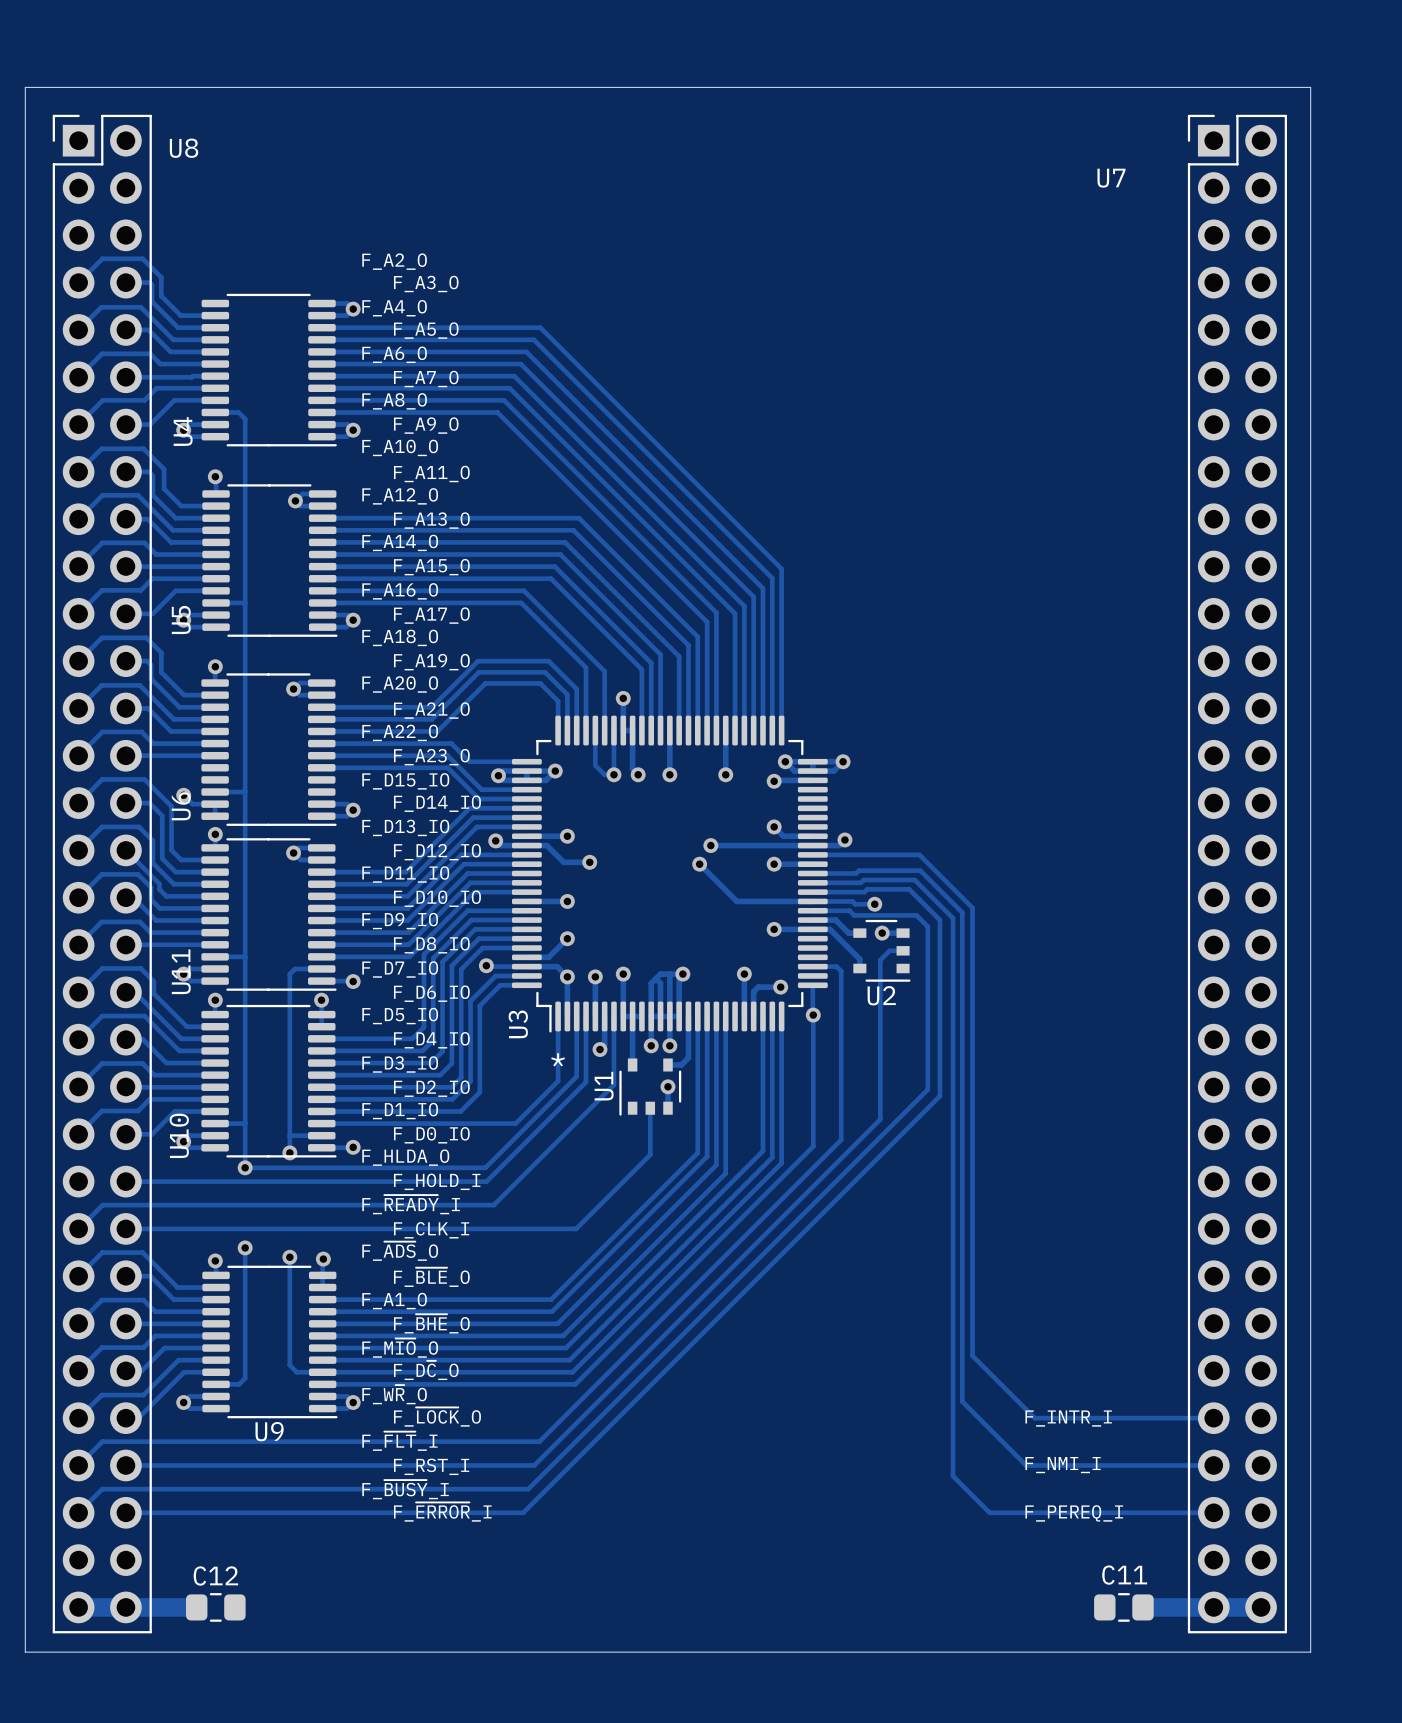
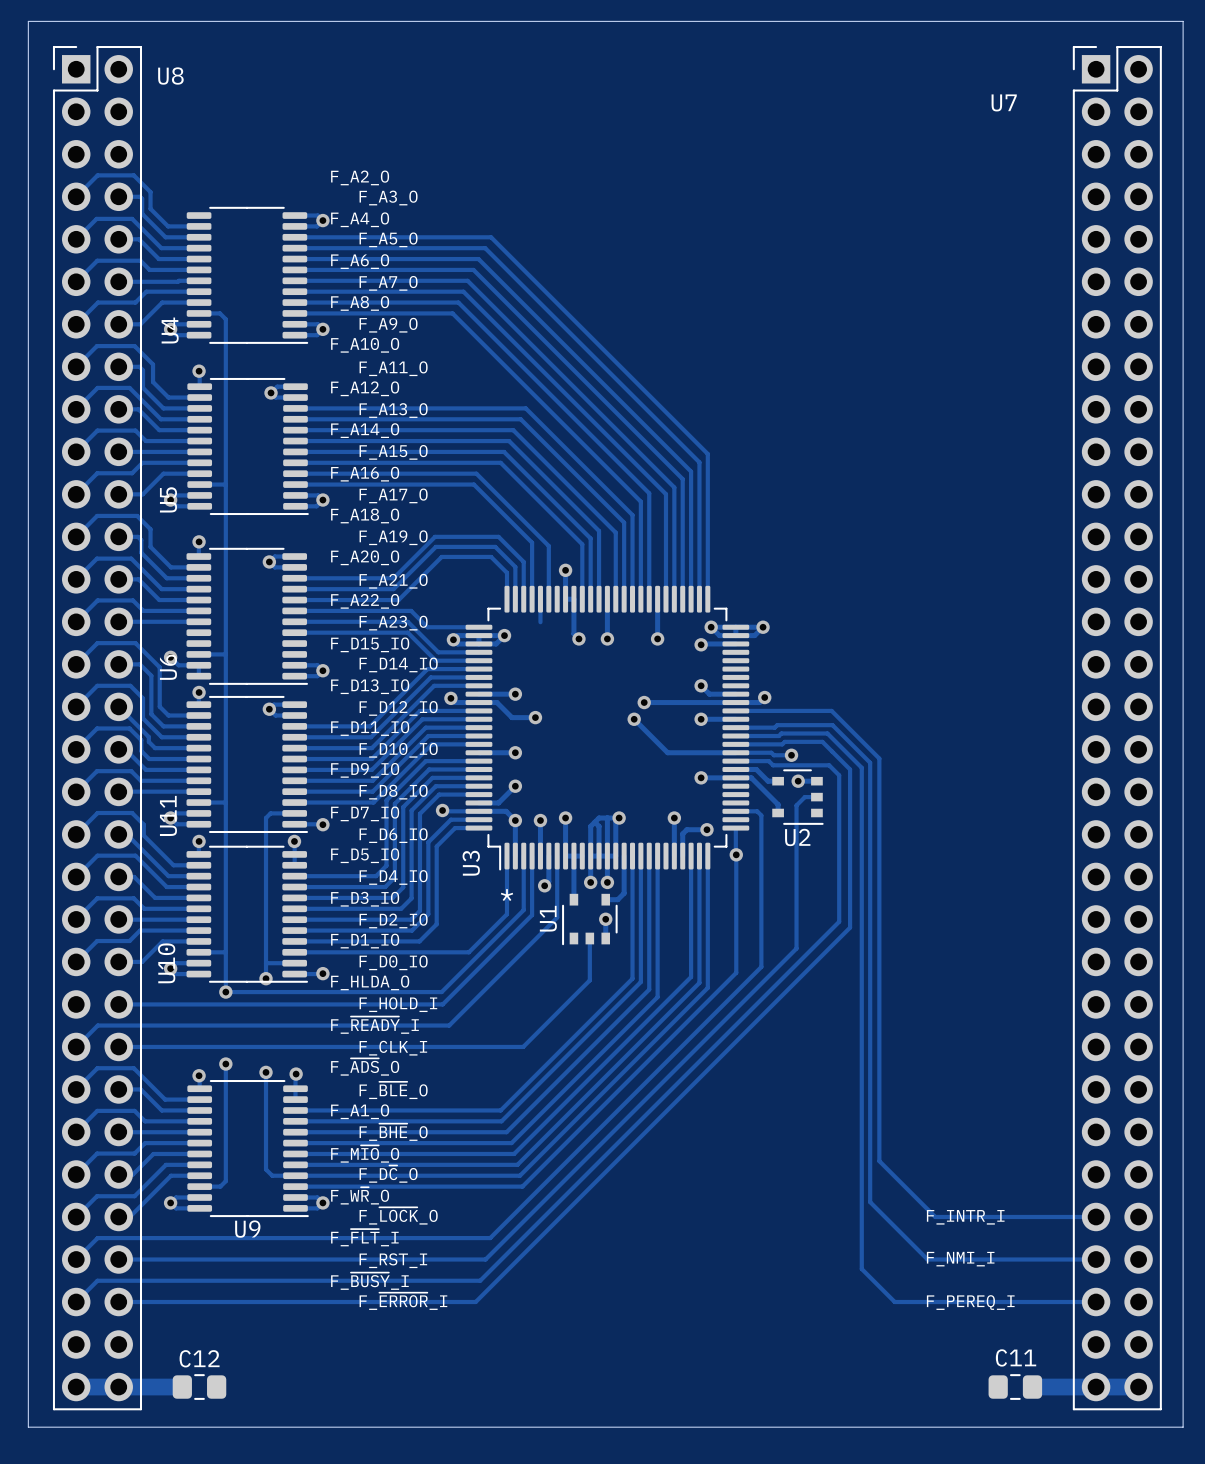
track: (613, 730) (613, 774) (604, 774) (595, 765) (595, 756) -> none
via: (613, 774) -> none

